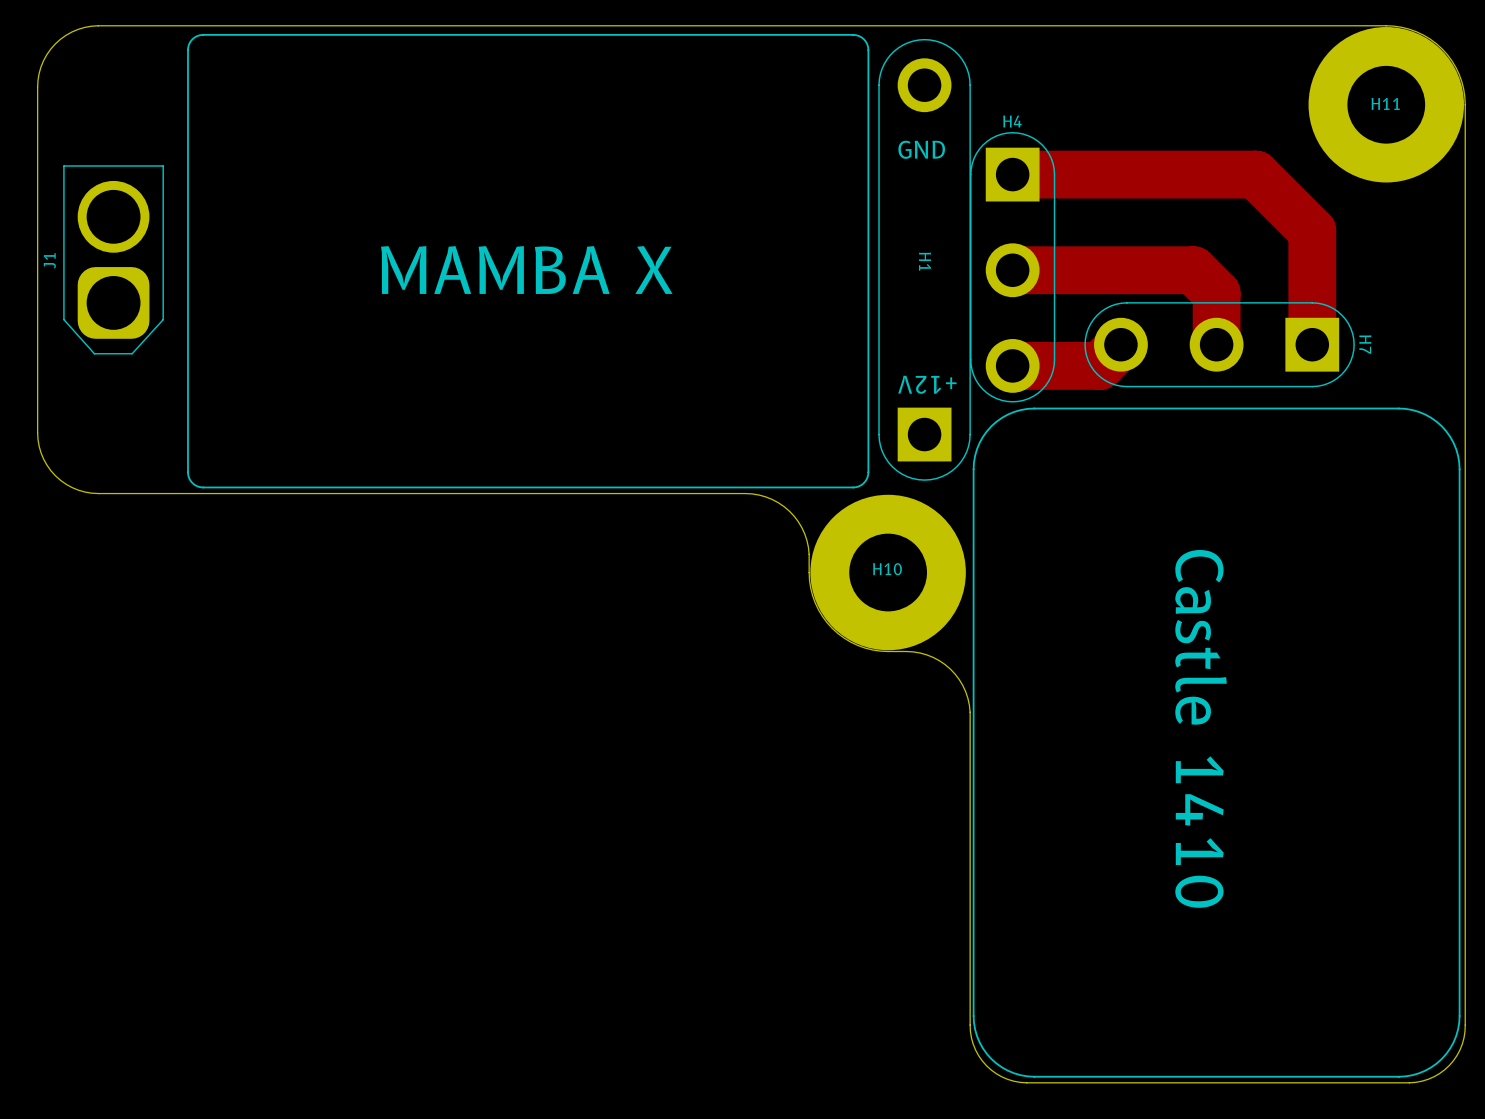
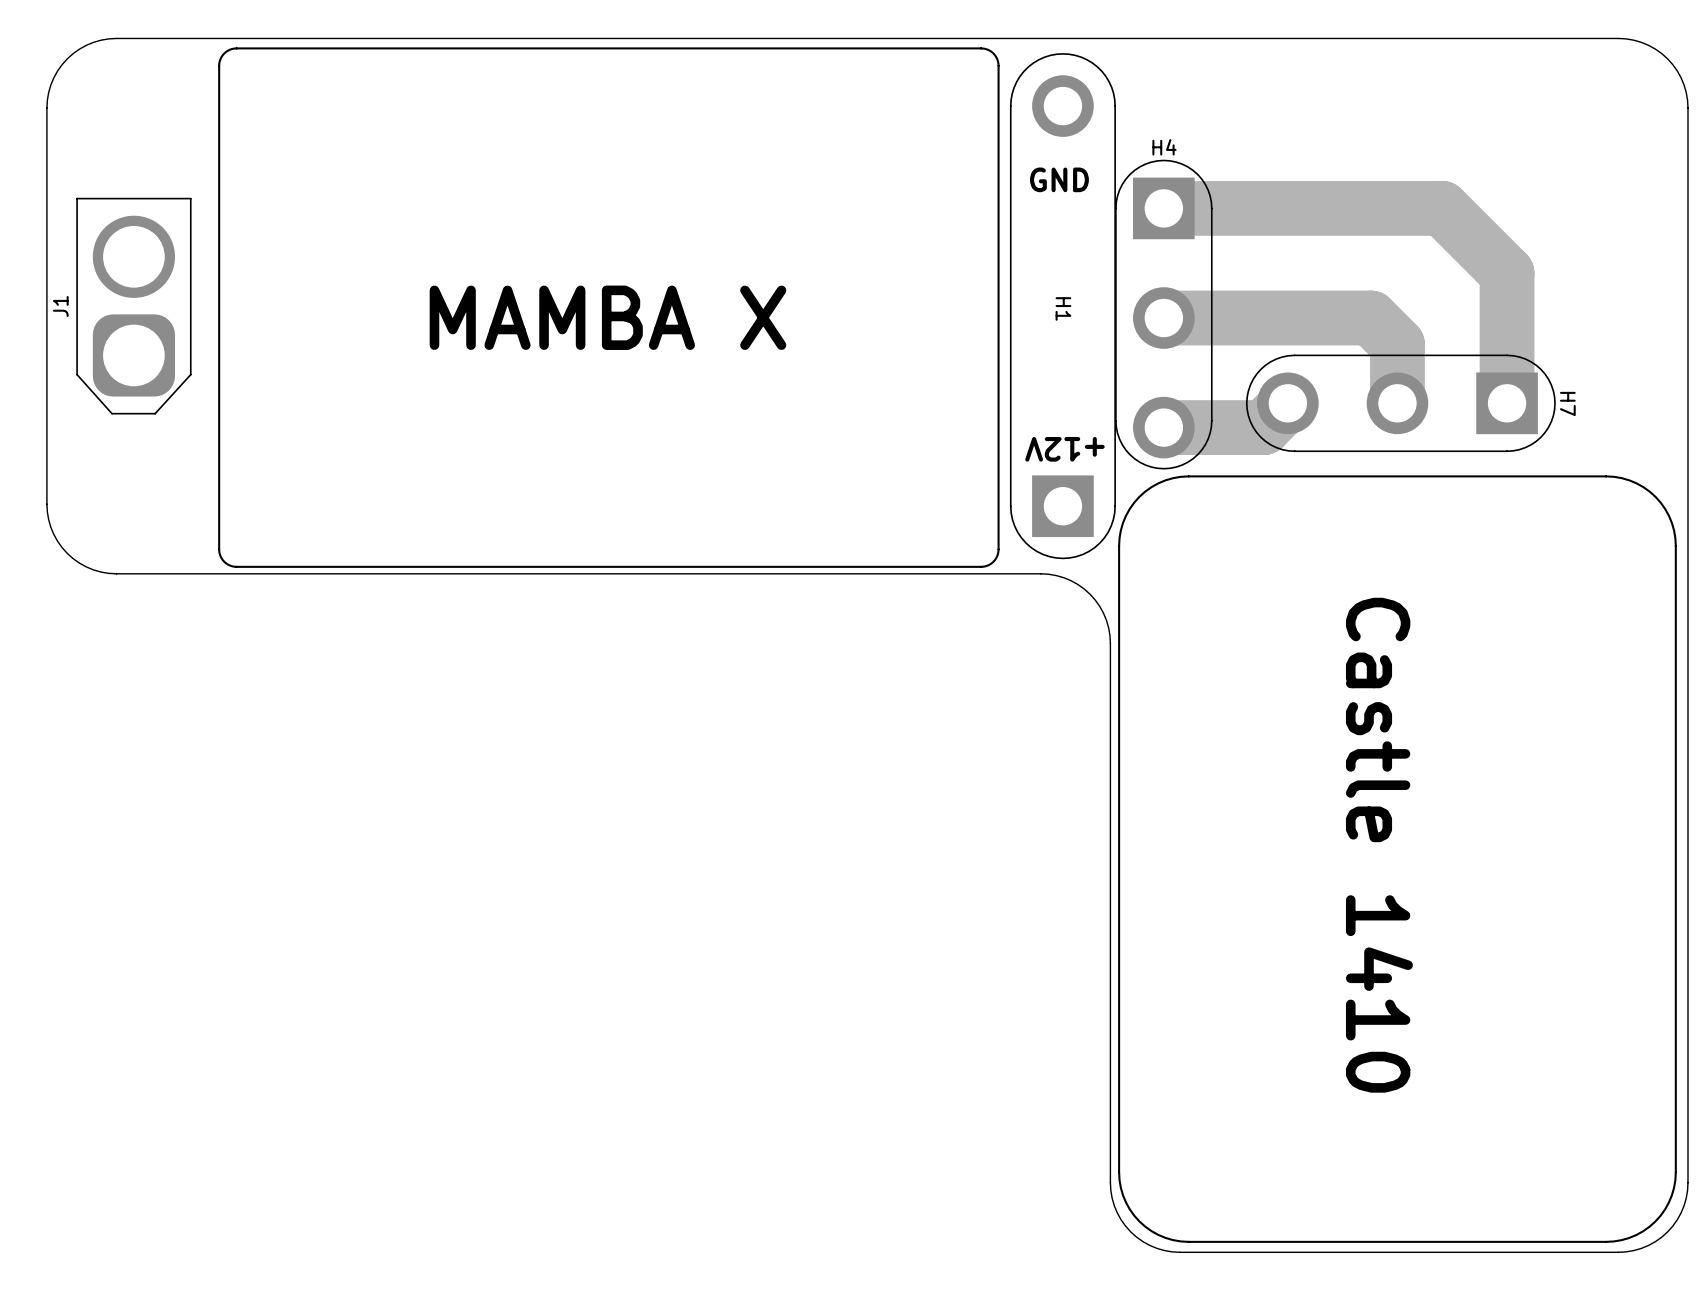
board edge: (37, 86) (41, 66) (46, 54) (55, 43) (66, 35) (78, 29) (98, 25) (1386, 25) (1409, 29) (1430, 39) (1447, 54) (1455, 67) (1463, 89) (1465, 104) (1465, 1025) (1462, 1043) (1453, 1060) (1434, 1076) (1409, 1082) (1026, 1082) (1007, 1079) (991, 1070) (975, 1049) (970, 1031) (970, 712) (965, 691) (959, 679) (950, 669) (933, 657) (913, 651) (880, 651) (865, 648) (850, 642) (838, 633) (822, 616) (812, 595) (809, 580) (808, 547) (804, 534) (798, 521) (784, 506) (772, 499) (759, 495) (745, 493) -> (46, 108) (48, 92) (53, 77) (67, 58) (86, 45) (101, 40) (116, 38) (1618, 38) (1641, 42) (1655, 49) (1667, 58) (1681, 77) (1686, 92) (1688, 108) (1688, 1182) (1684, 1205) (1672, 1226) (1661, 1237) (1648, 1245) (1633, 1250) (1618, 1252) (1179, 1252) (1157, 1248) (1136, 1237) (1125, 1226) (1117, 1212) (1112, 1198) (1110, 1182) (1110, 643) (1108, 627) (1103, 613) (1095, 600) (1077, 584) (1063, 577) (1048, 574) (857, 573)
H11: (1386, 104) -> none
H10: (888, 572) -> none

